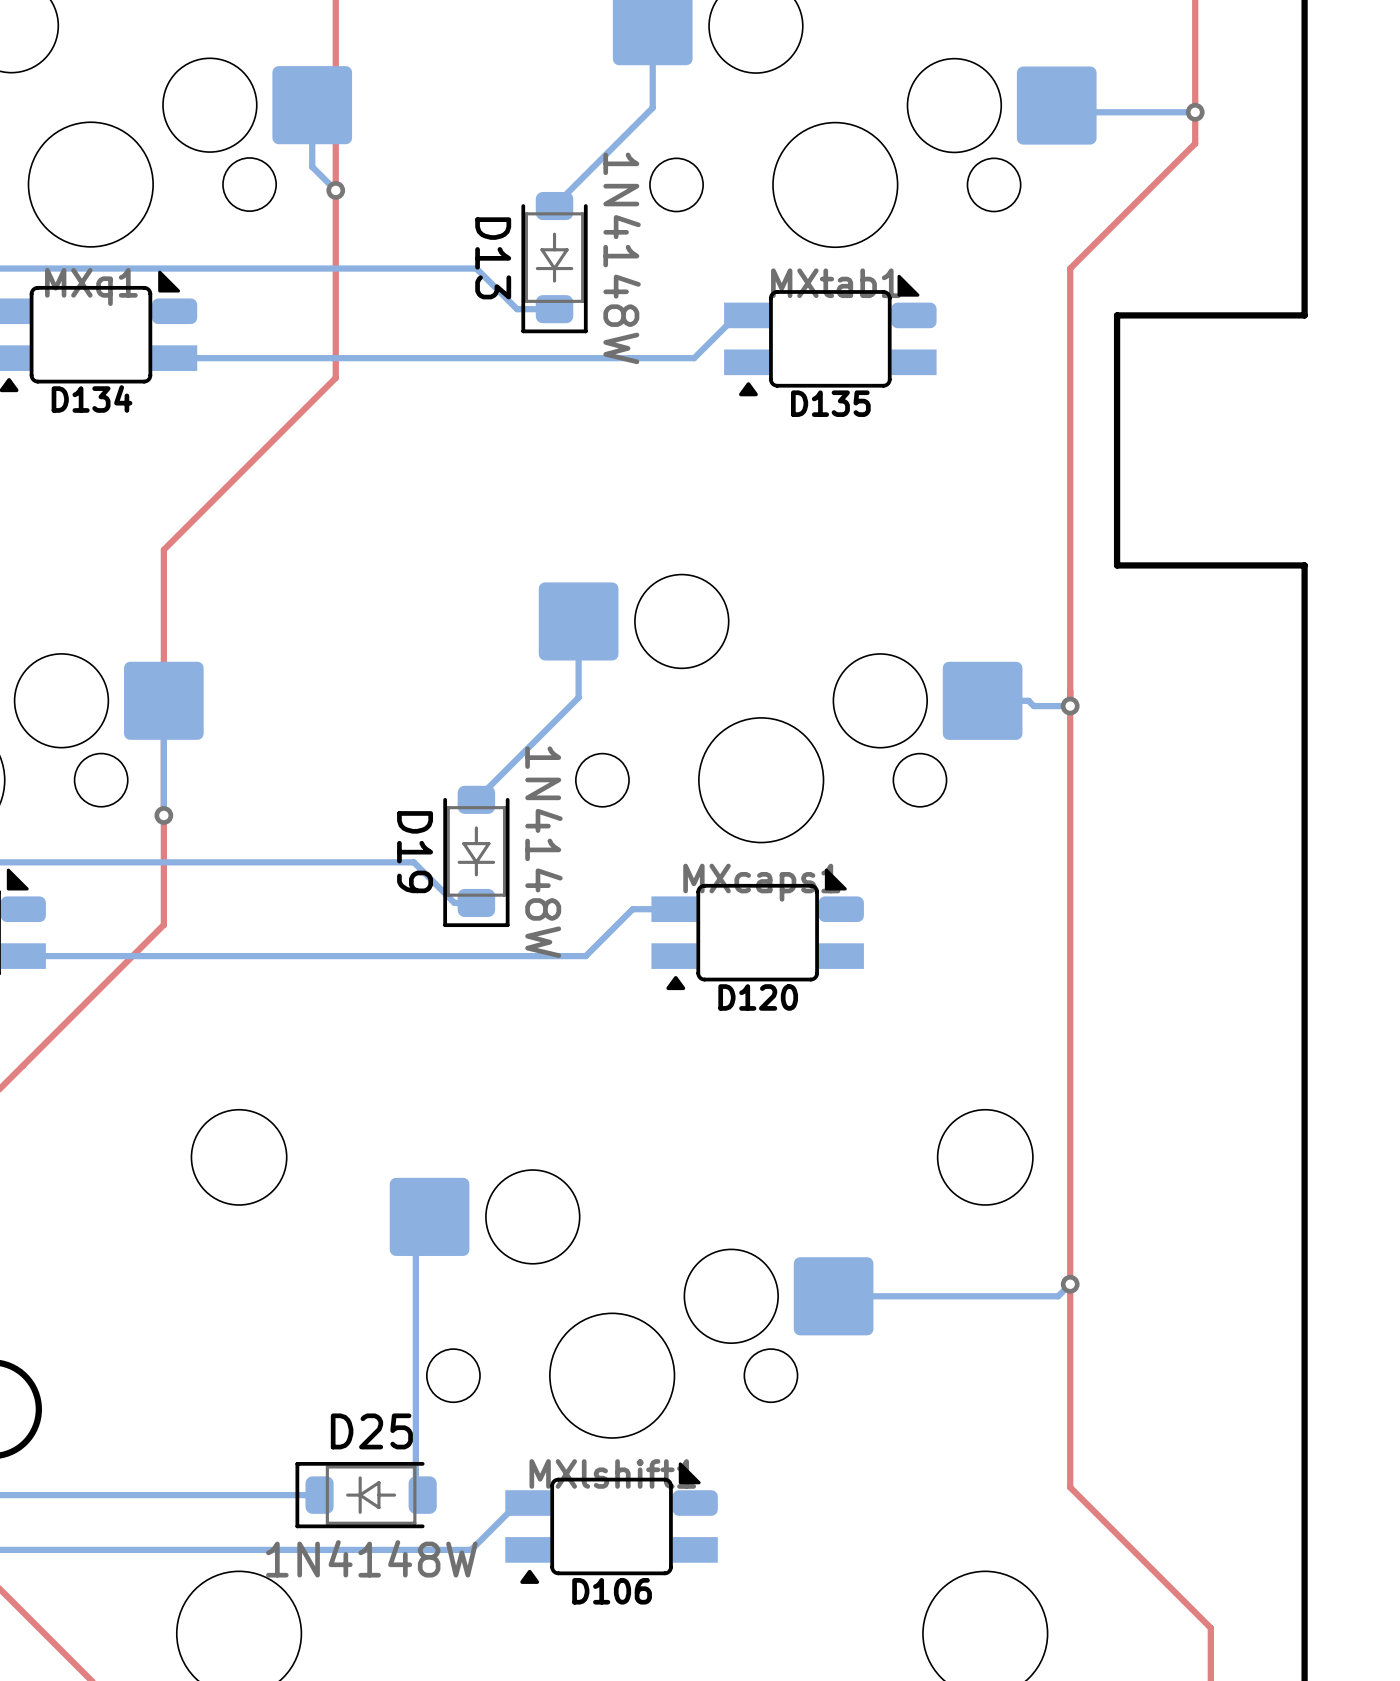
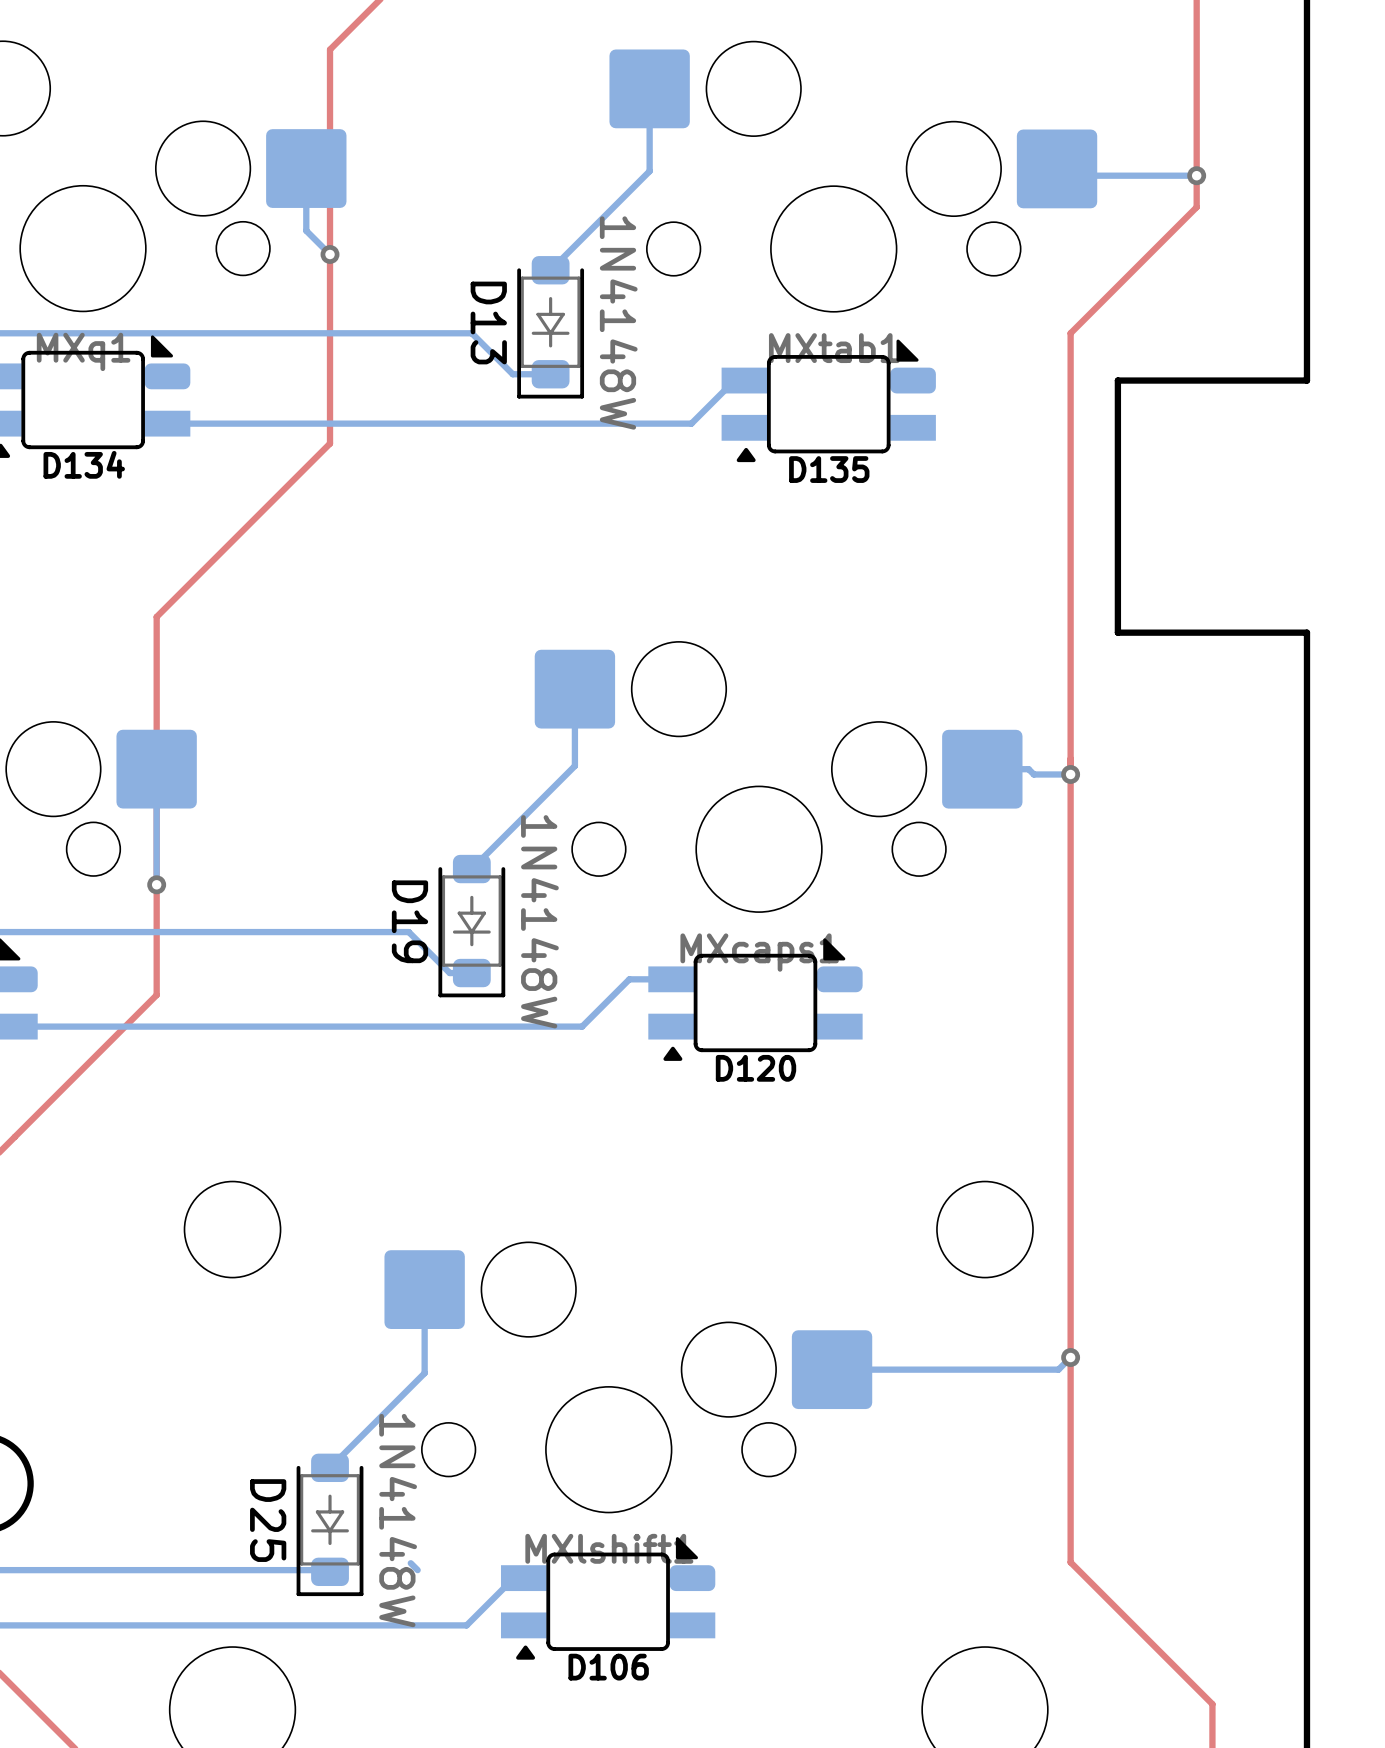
bottom track: none -> (424, 1289) (424, 1373) (330, 1467)
bottom track: (415, 1230) (415, 1488) -> none
D25 rotation: 0° (366, 1495) -> 90° counterclockwise (330, 1524)

